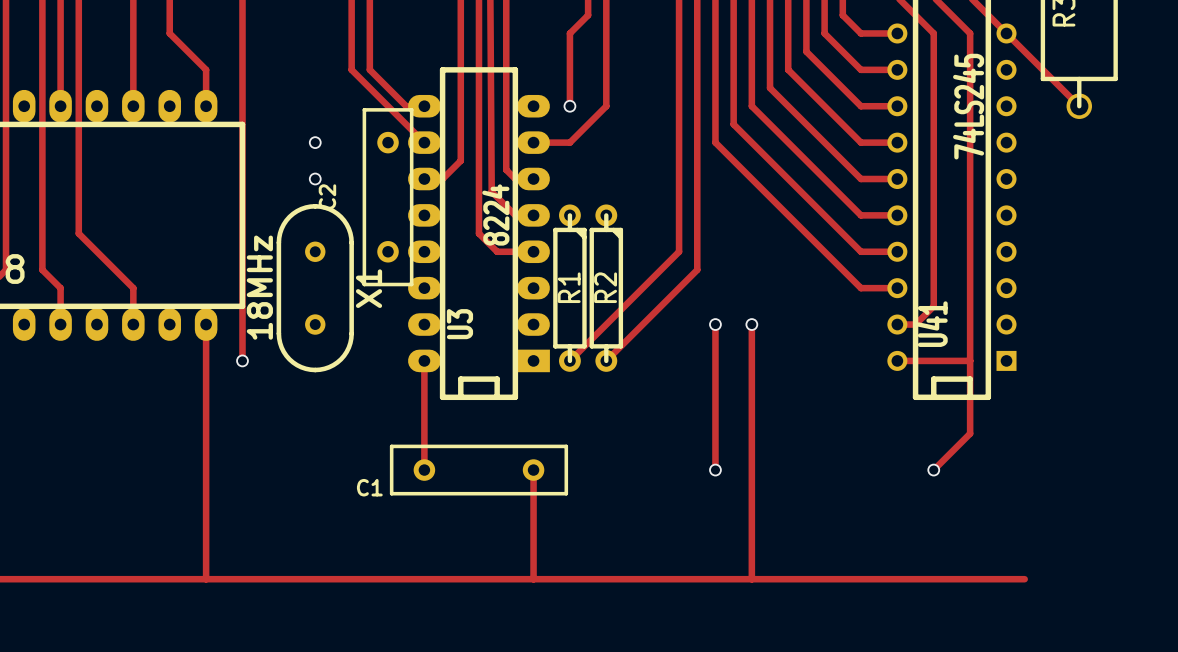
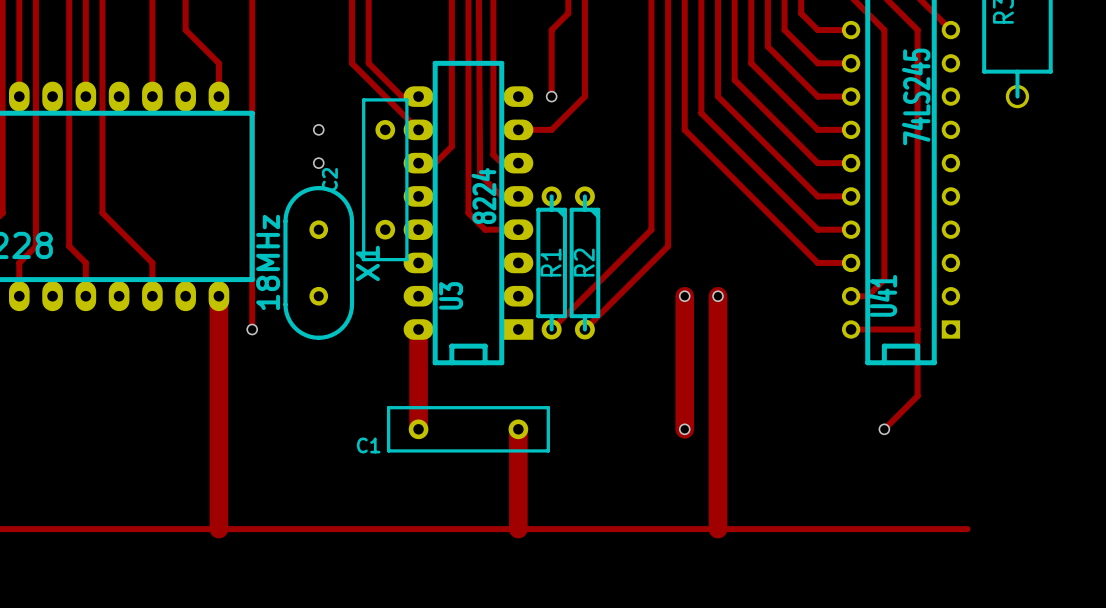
track: (1006, 33) (1079, 106) -> none
track width: thin (206, 324) (206, 579) -> thick (218, 296) (218, 529)
track width: thin (715, 324) (715, 470) -> thick (684, 296) (684, 429)
track width: thin (751, 324) (751, 579) -> thick (718, 296) (718, 529)
track width: thin (424, 360) (424, 470) -> thick (418, 329) (418, 429)
track width: thin (533, 470) (533, 579) -> thick (518, 429) (518, 529)

